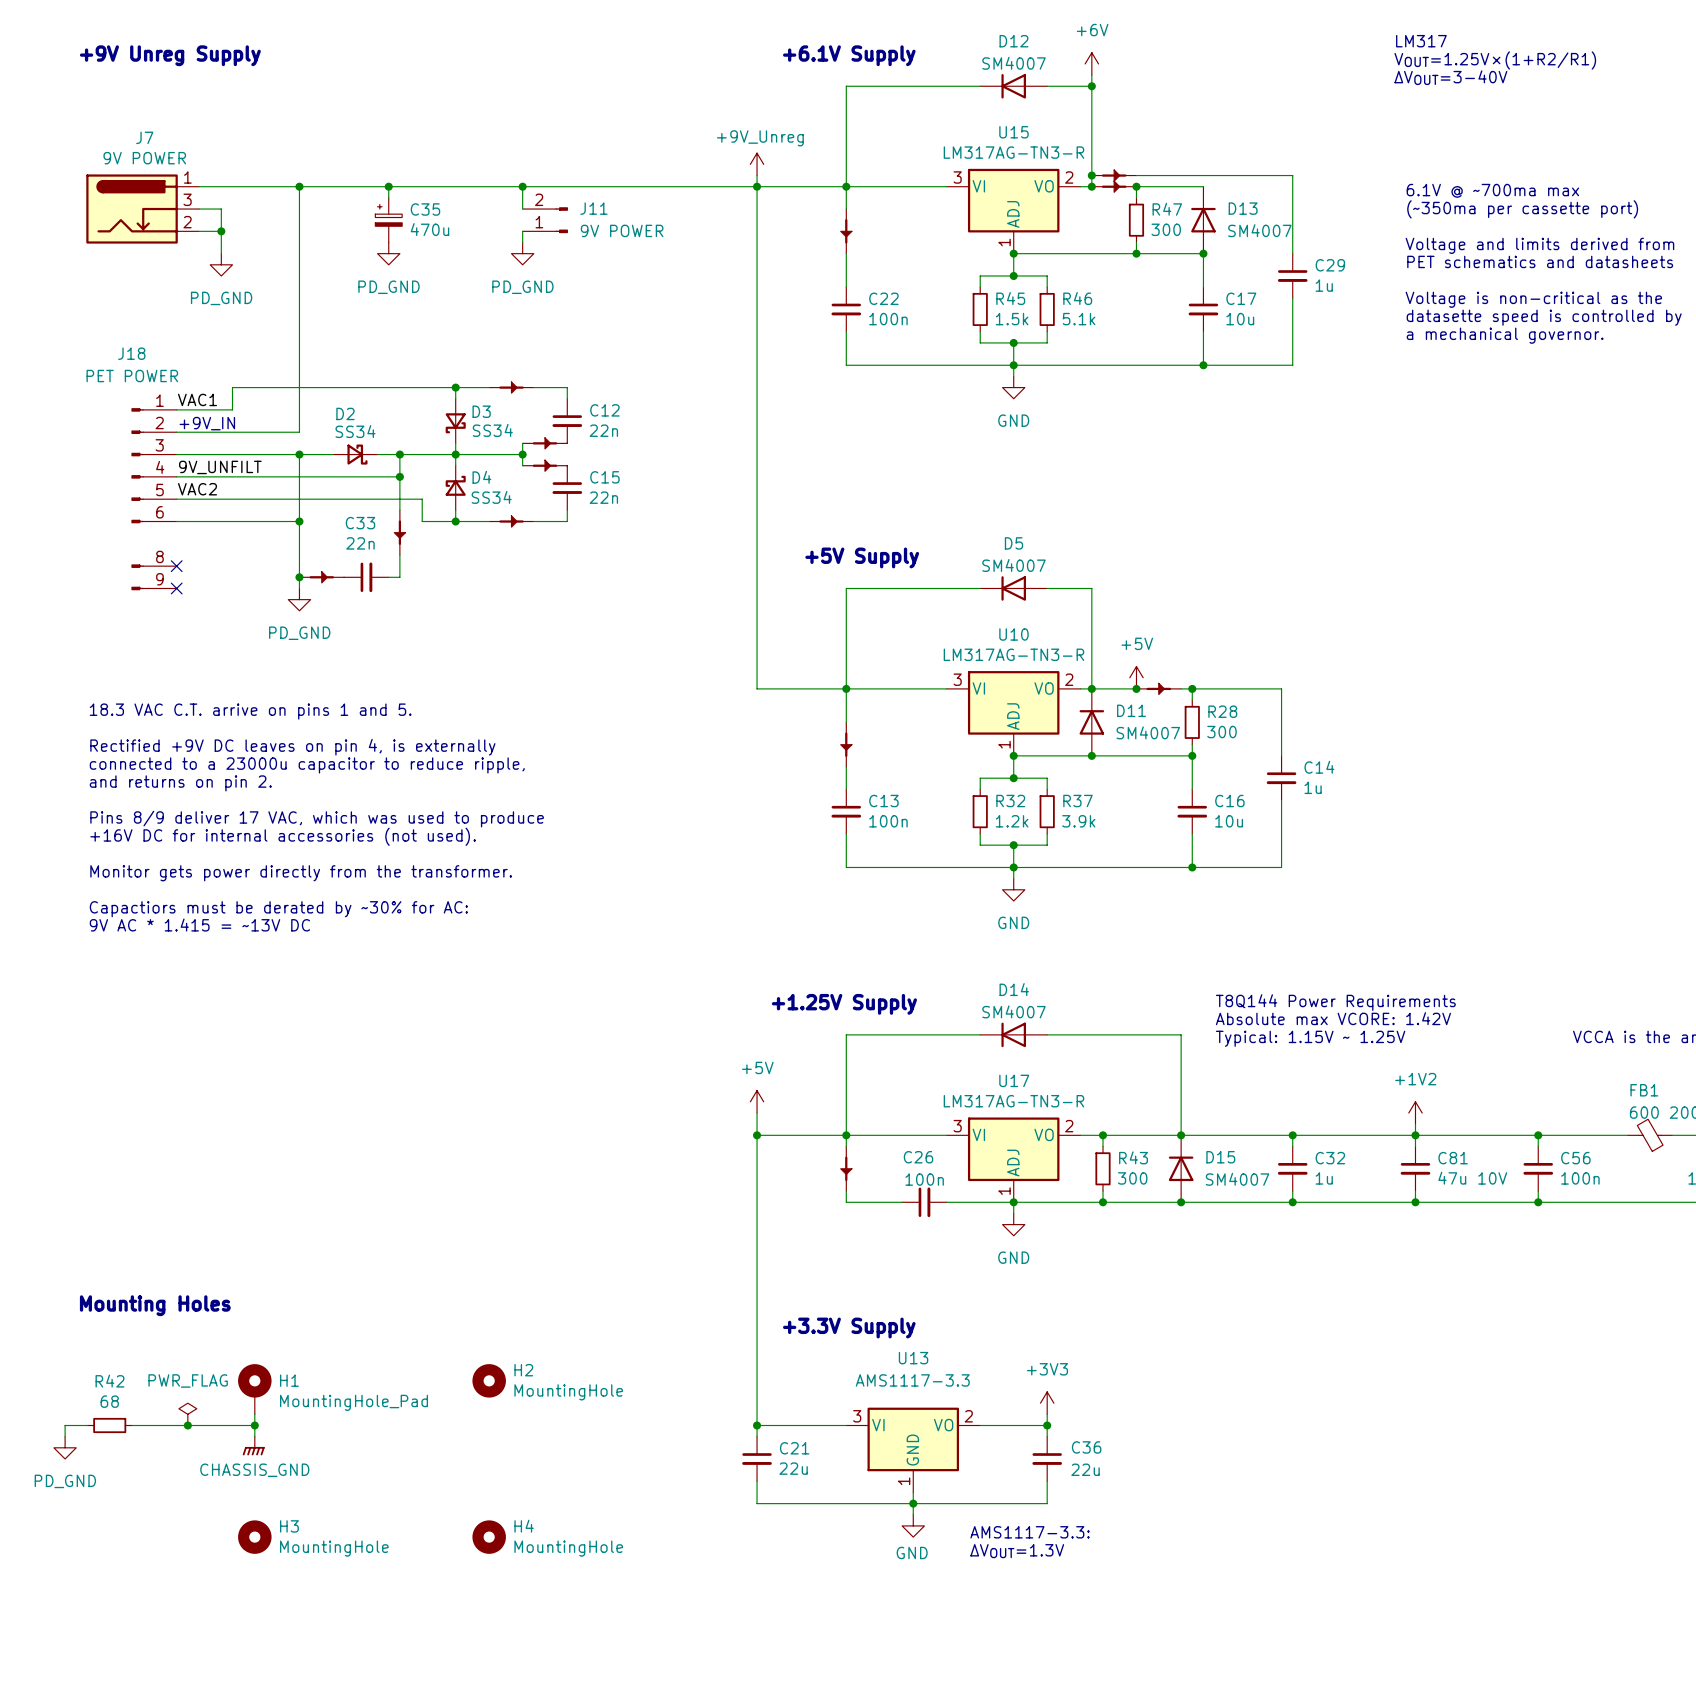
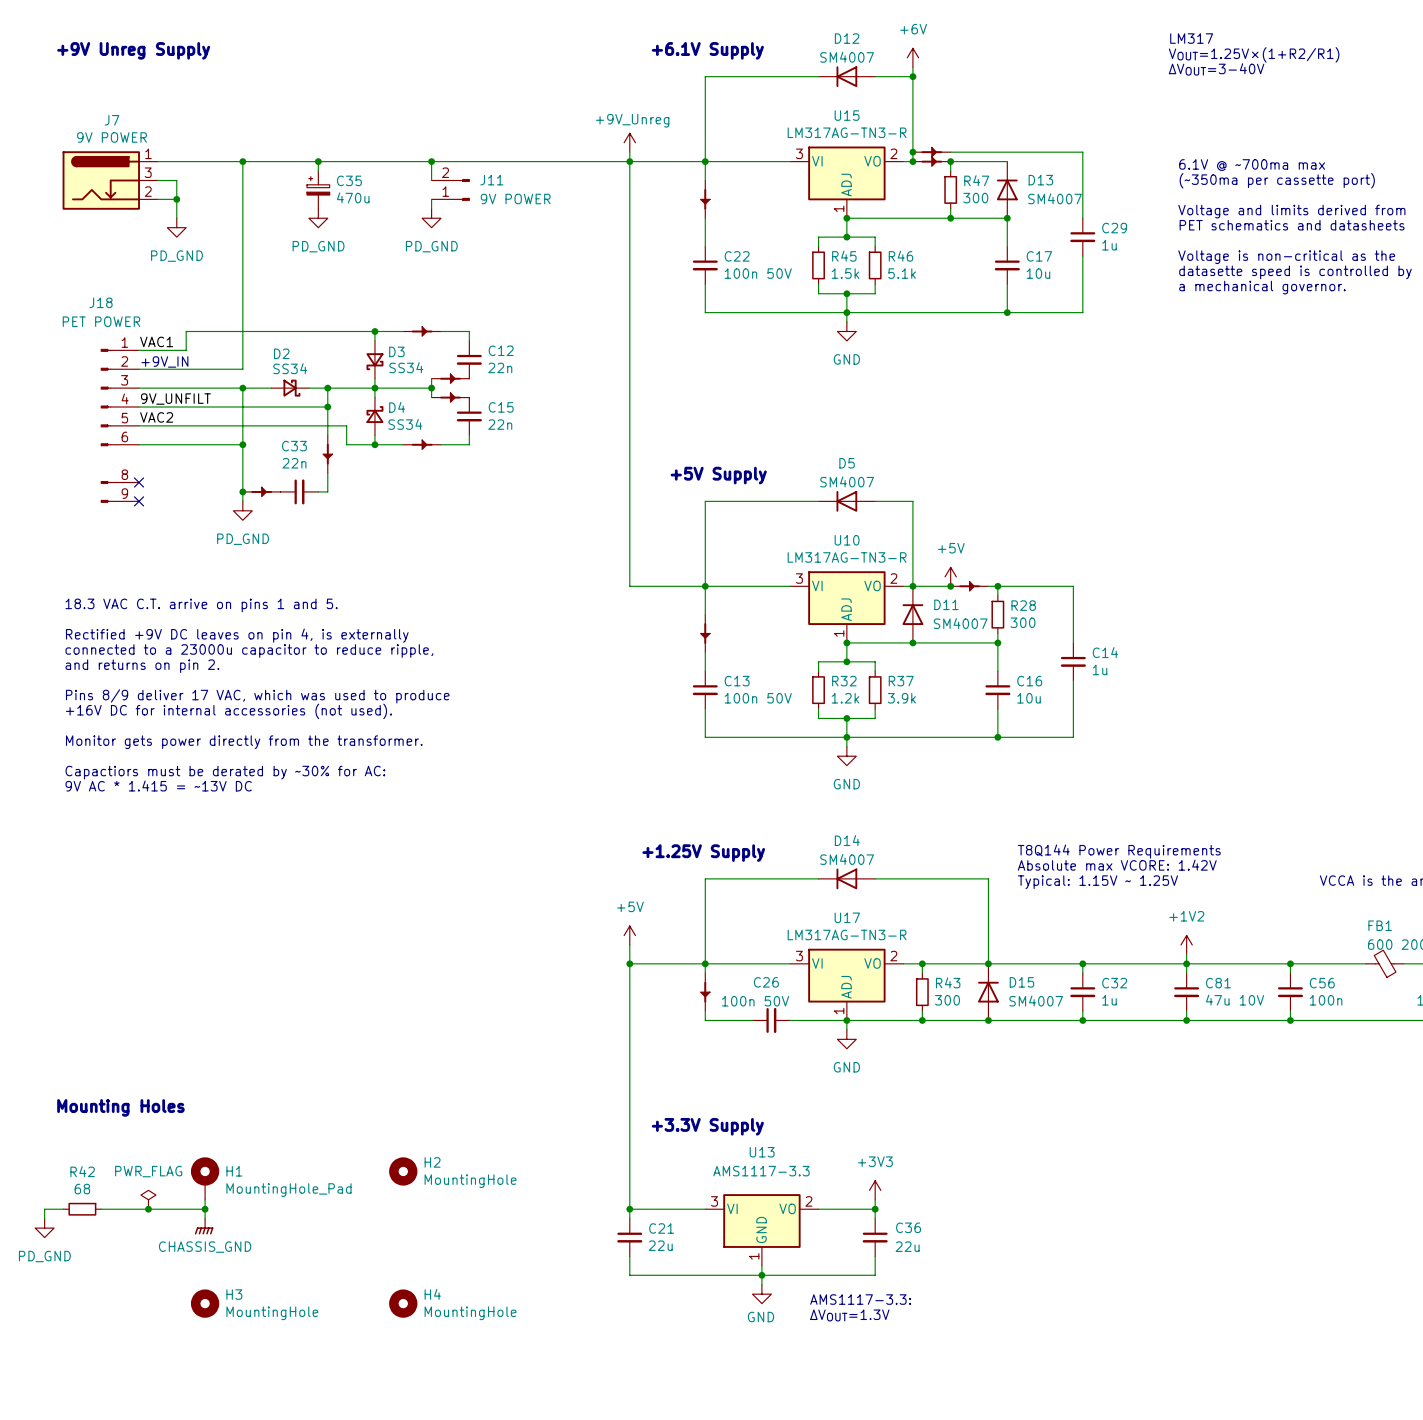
C22 value: 100n (888, 319) -> 100n 50V (758, 273)
C13 value: 100n (888, 821) -> 100n 50V (758, 698)
C26 value: 100n (924, 1179) -> 100n 50V (755, 1001)

